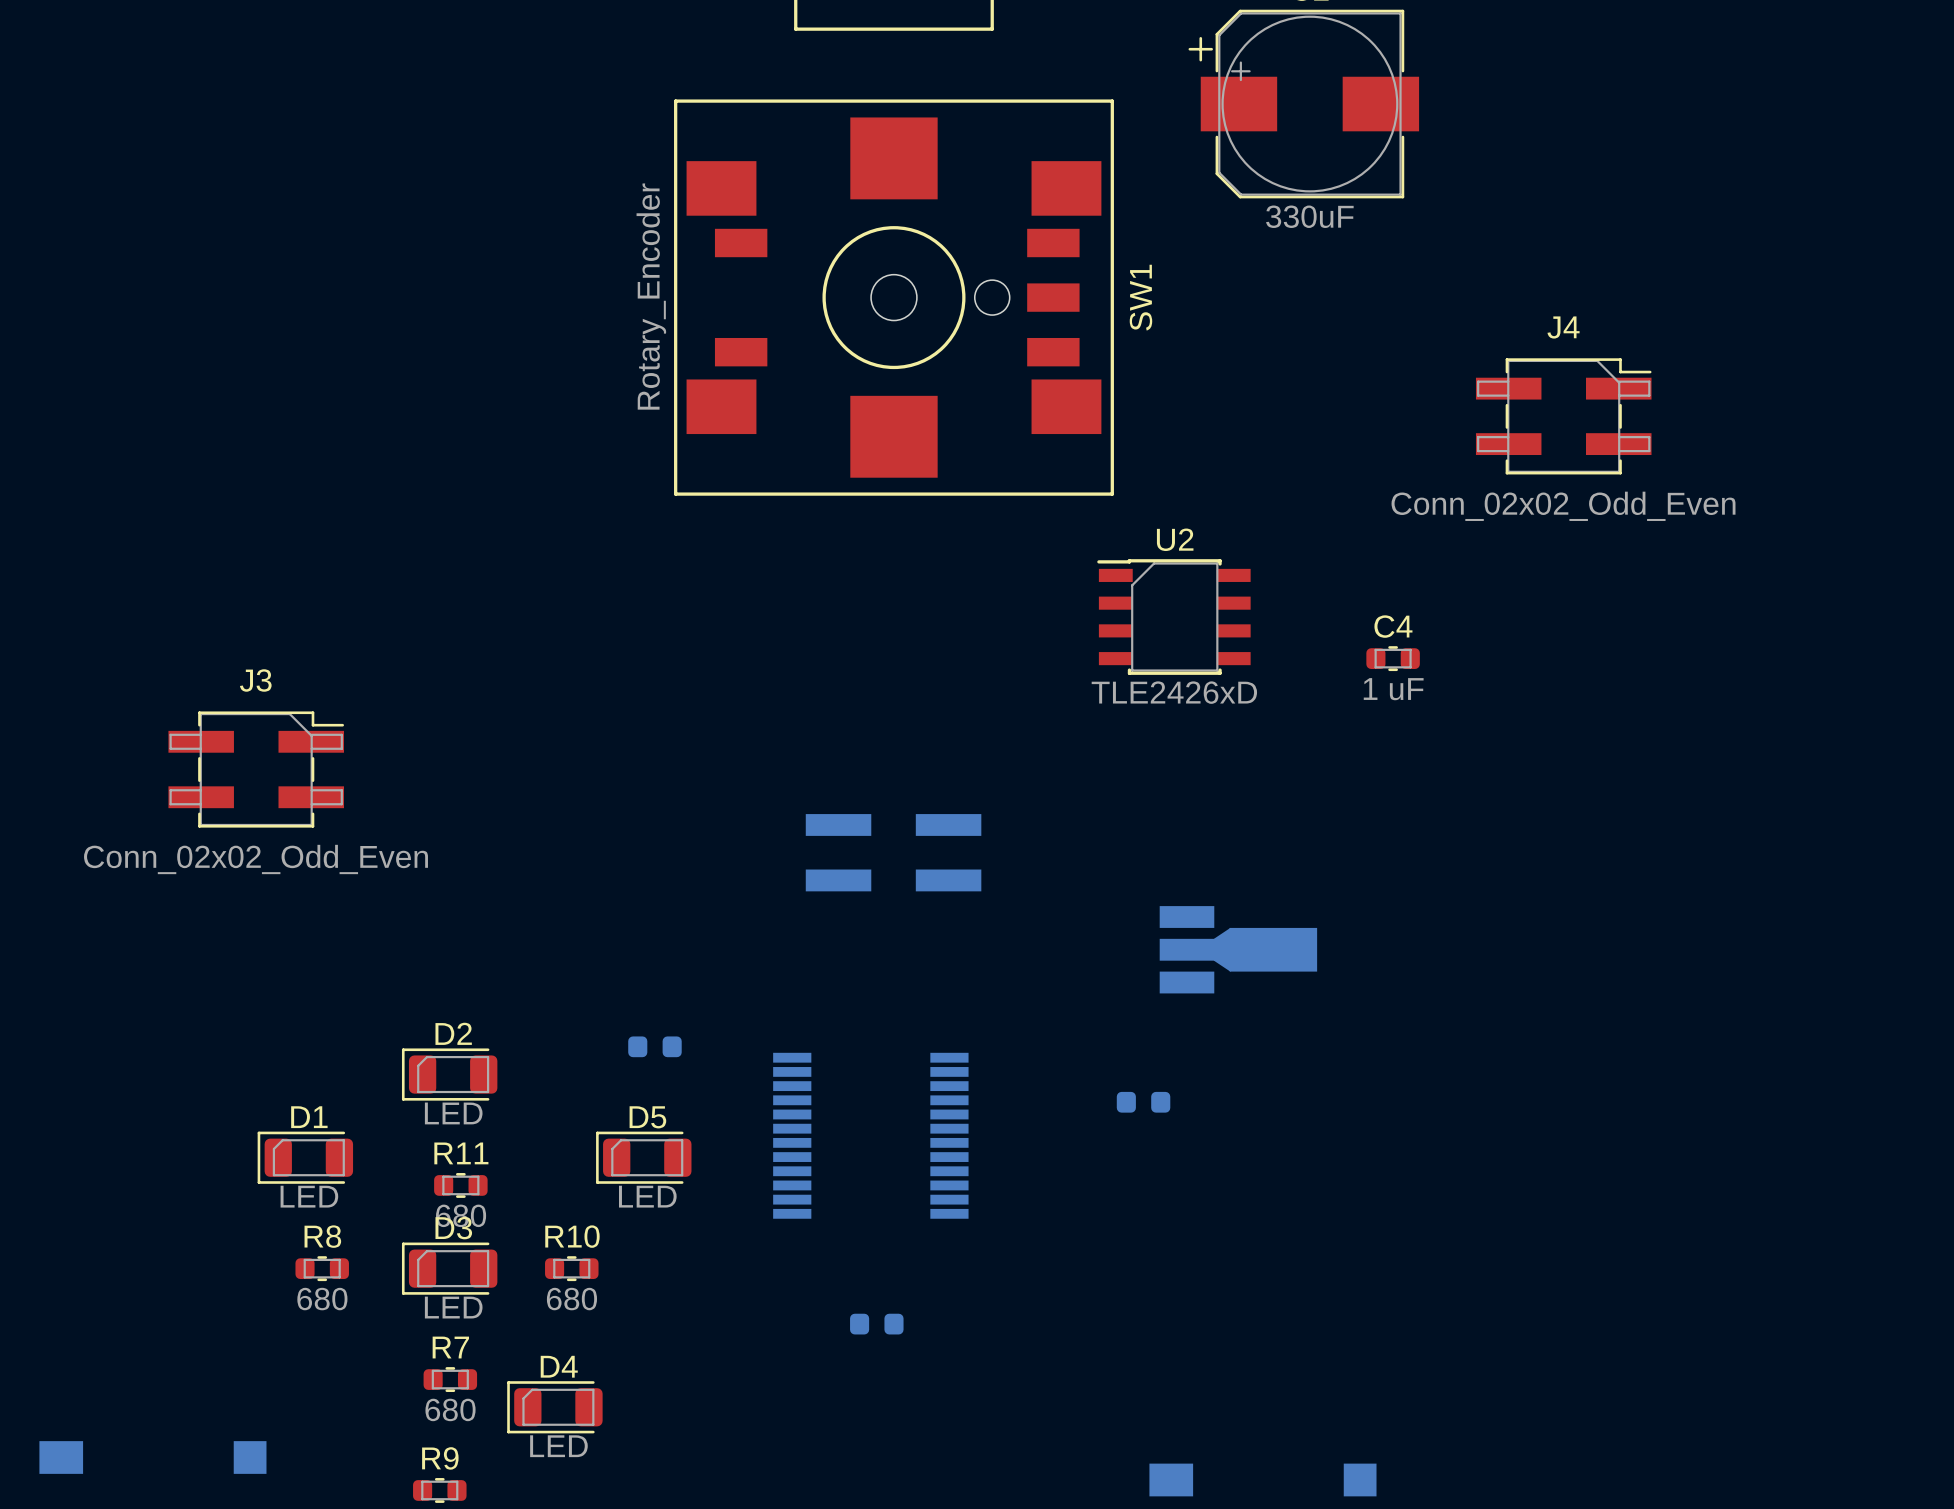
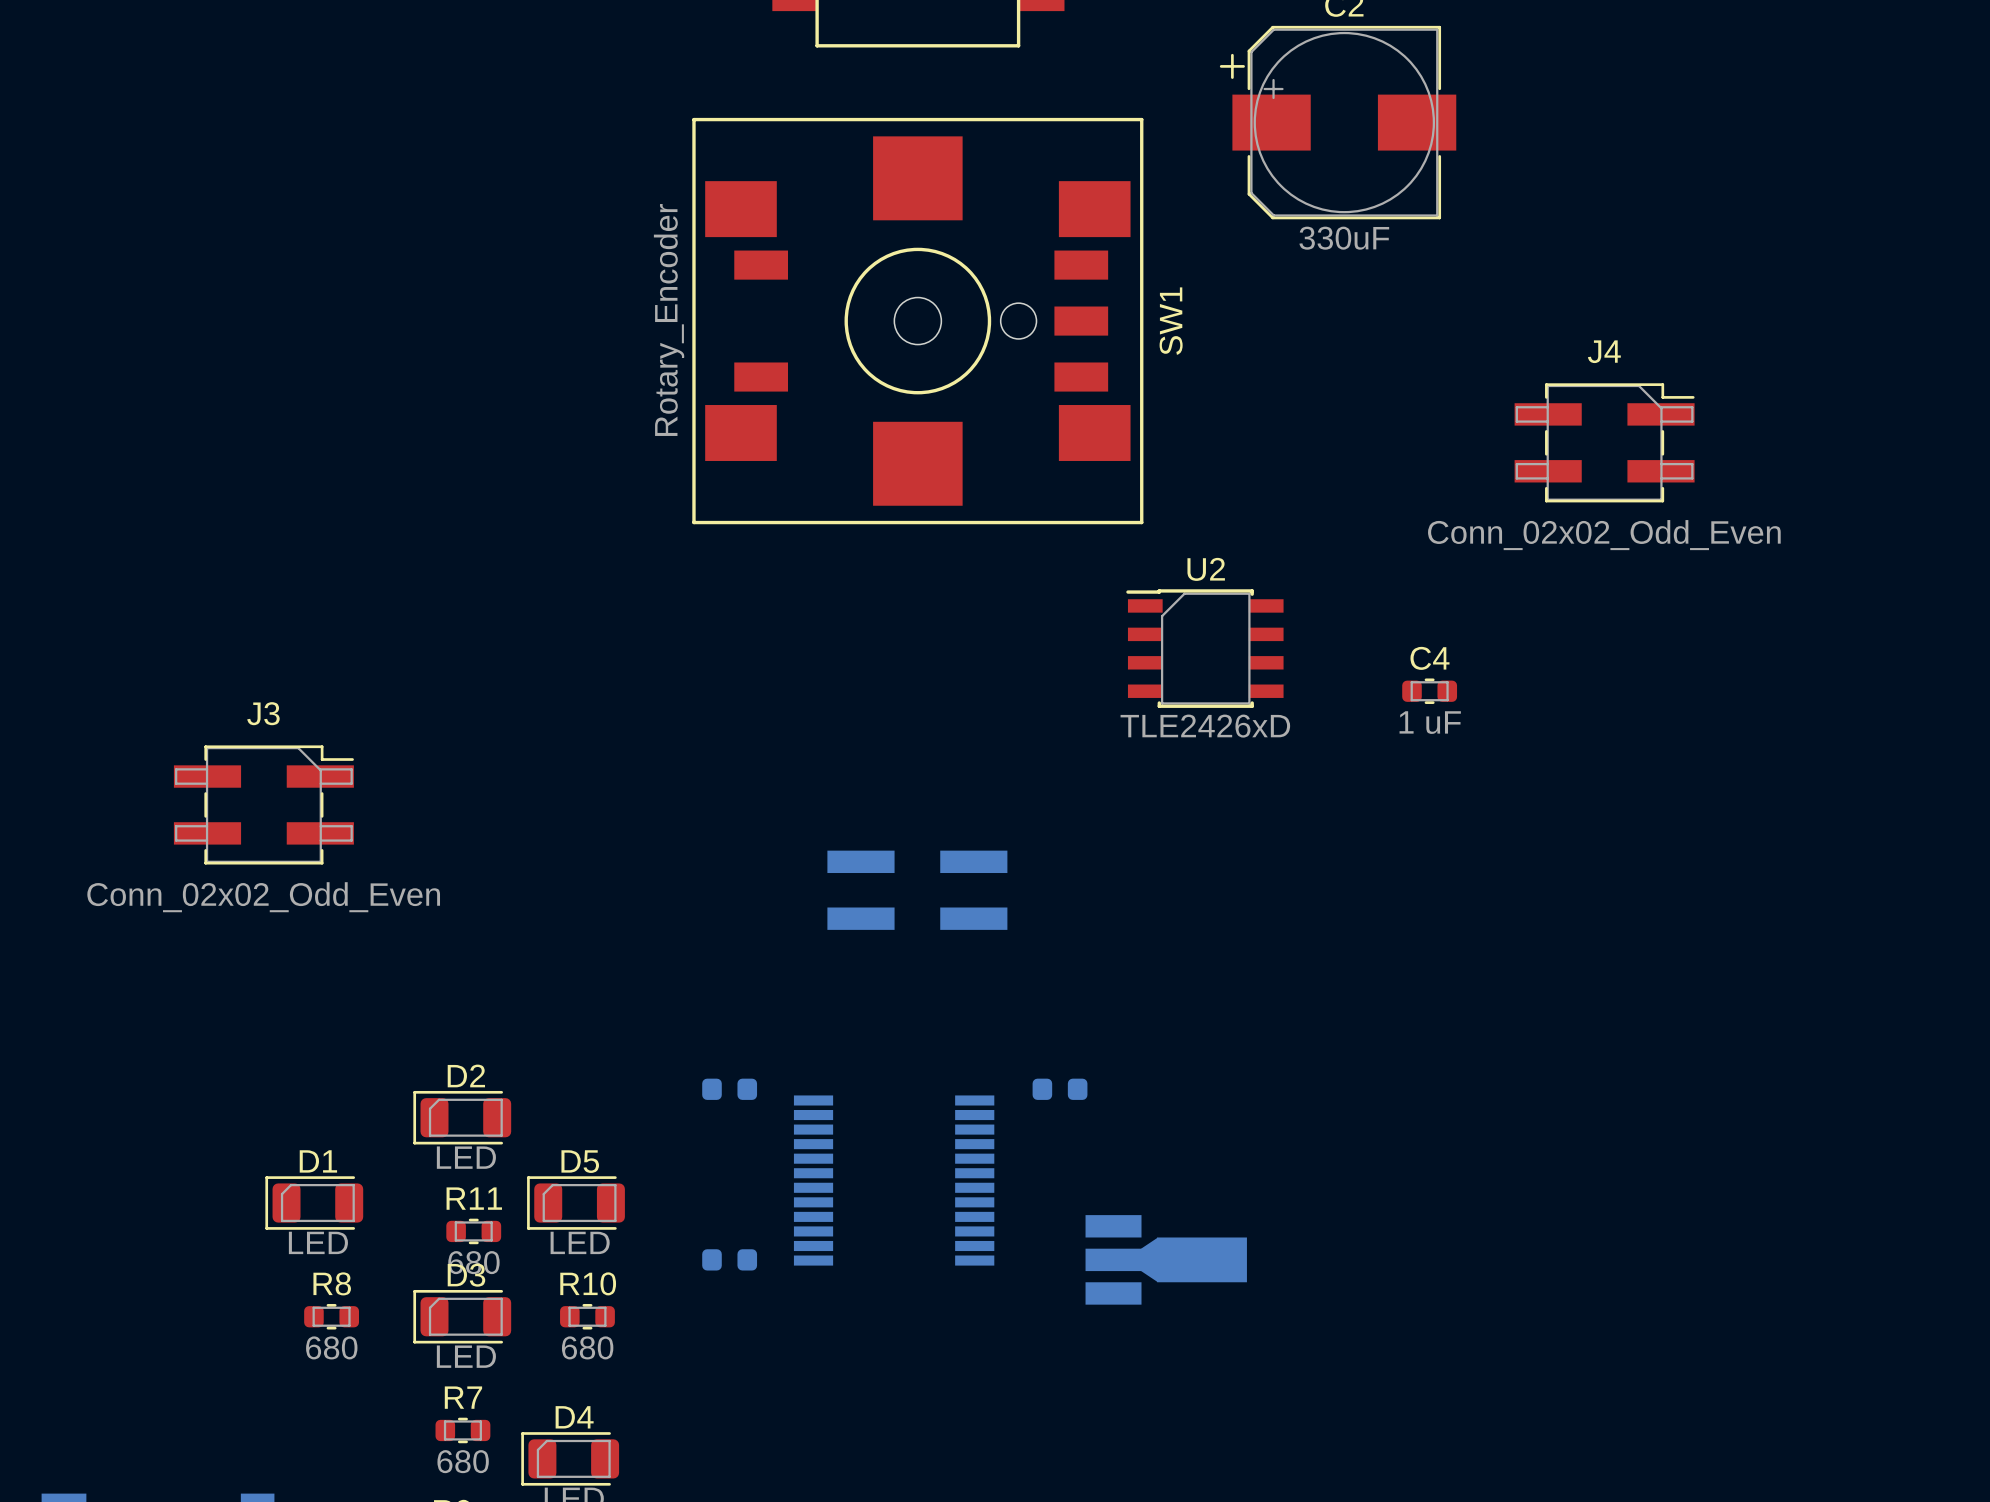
part position: (1238, 949) -> (1166, 1259)
part position: (654, 1046) -> (729, 1089)
part position: (1143, 1102) -> (1060, 1089)
D5 position: (643, 1157) -> (575, 1203)
part: none -> (729, 1259)
part: (876, 1324) -> none

